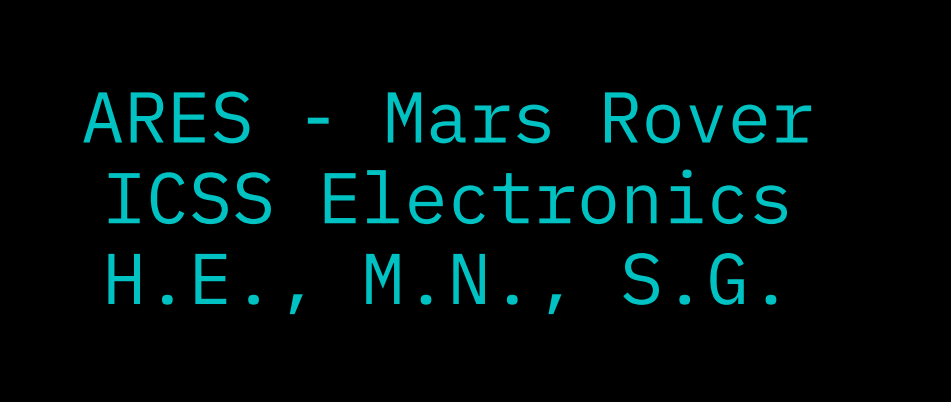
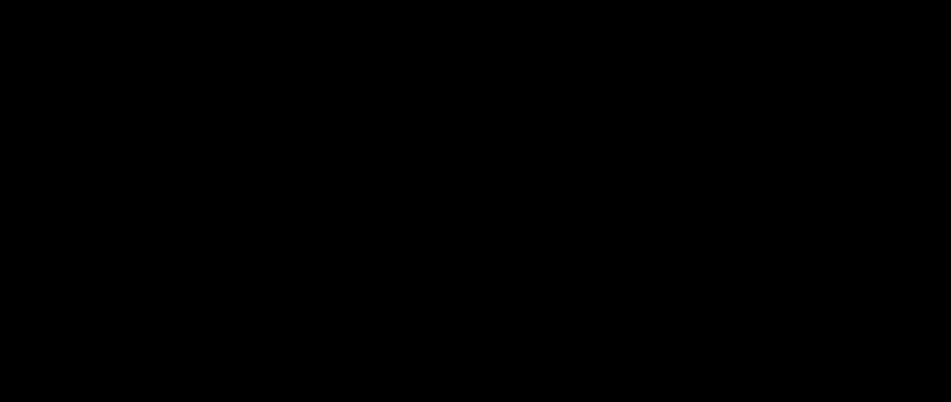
text: ARES - Mars Rover (447, 117) -> none
text: ICSS Electronics (447, 196) -> none
text: H.E., M.N., S.G. (442, 283) -> none

